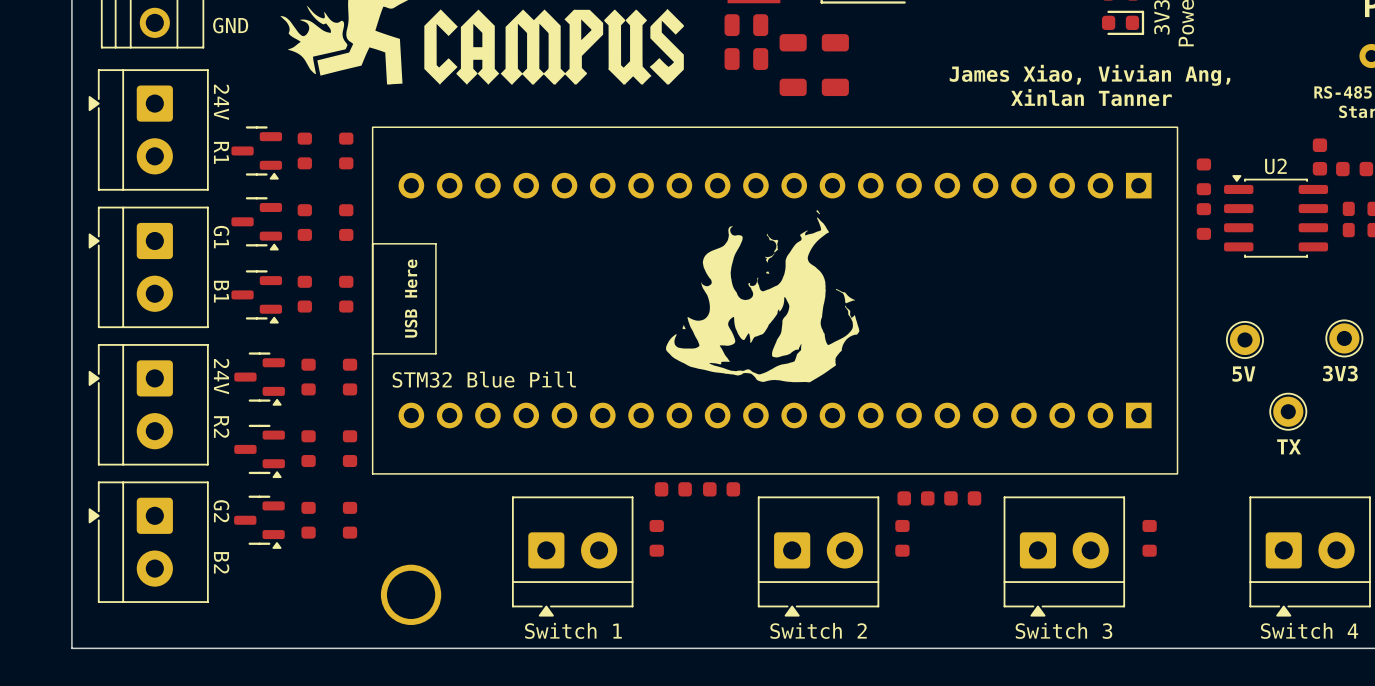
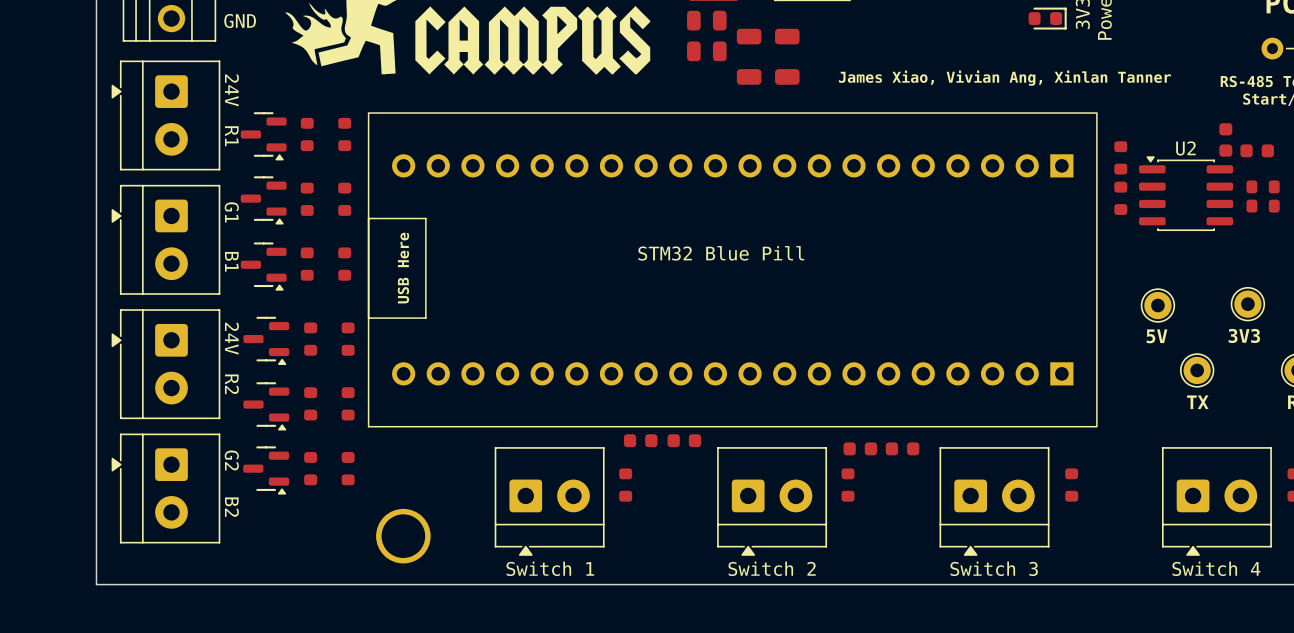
text: James Xiao, Vivian Ang, (1089, 75) -> James Xiao, Vivian Ang, Xinlan Tanner (1004, 78)
text: Xinlan Tanner (1091, 97) -> none
drawing: [666, 210, 860, 383] -> none
text position: STM32 Blue Pill (484, 379) -> STM32 Blue Pill (721, 253)

